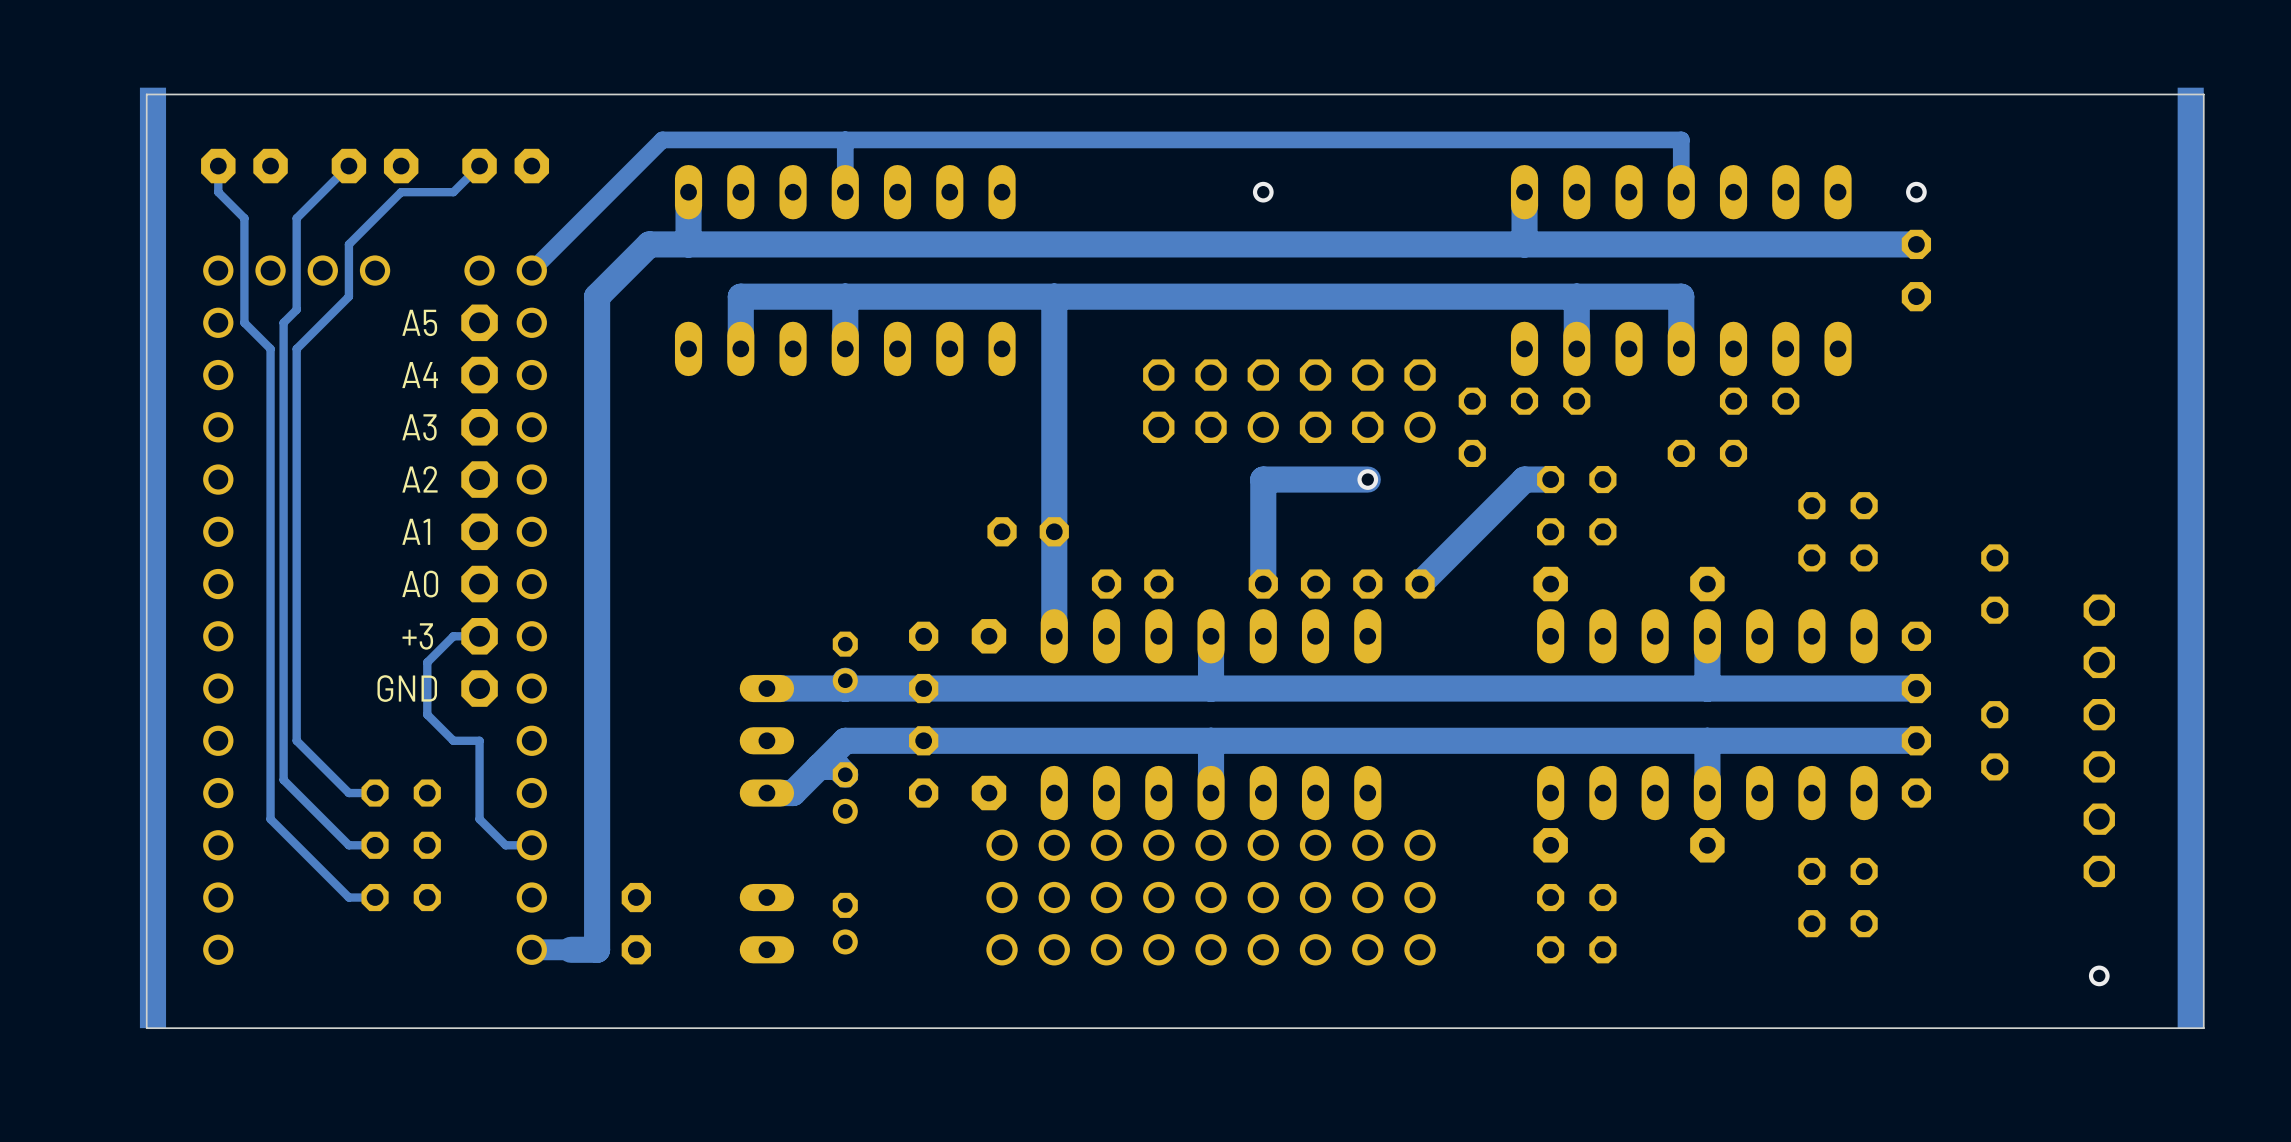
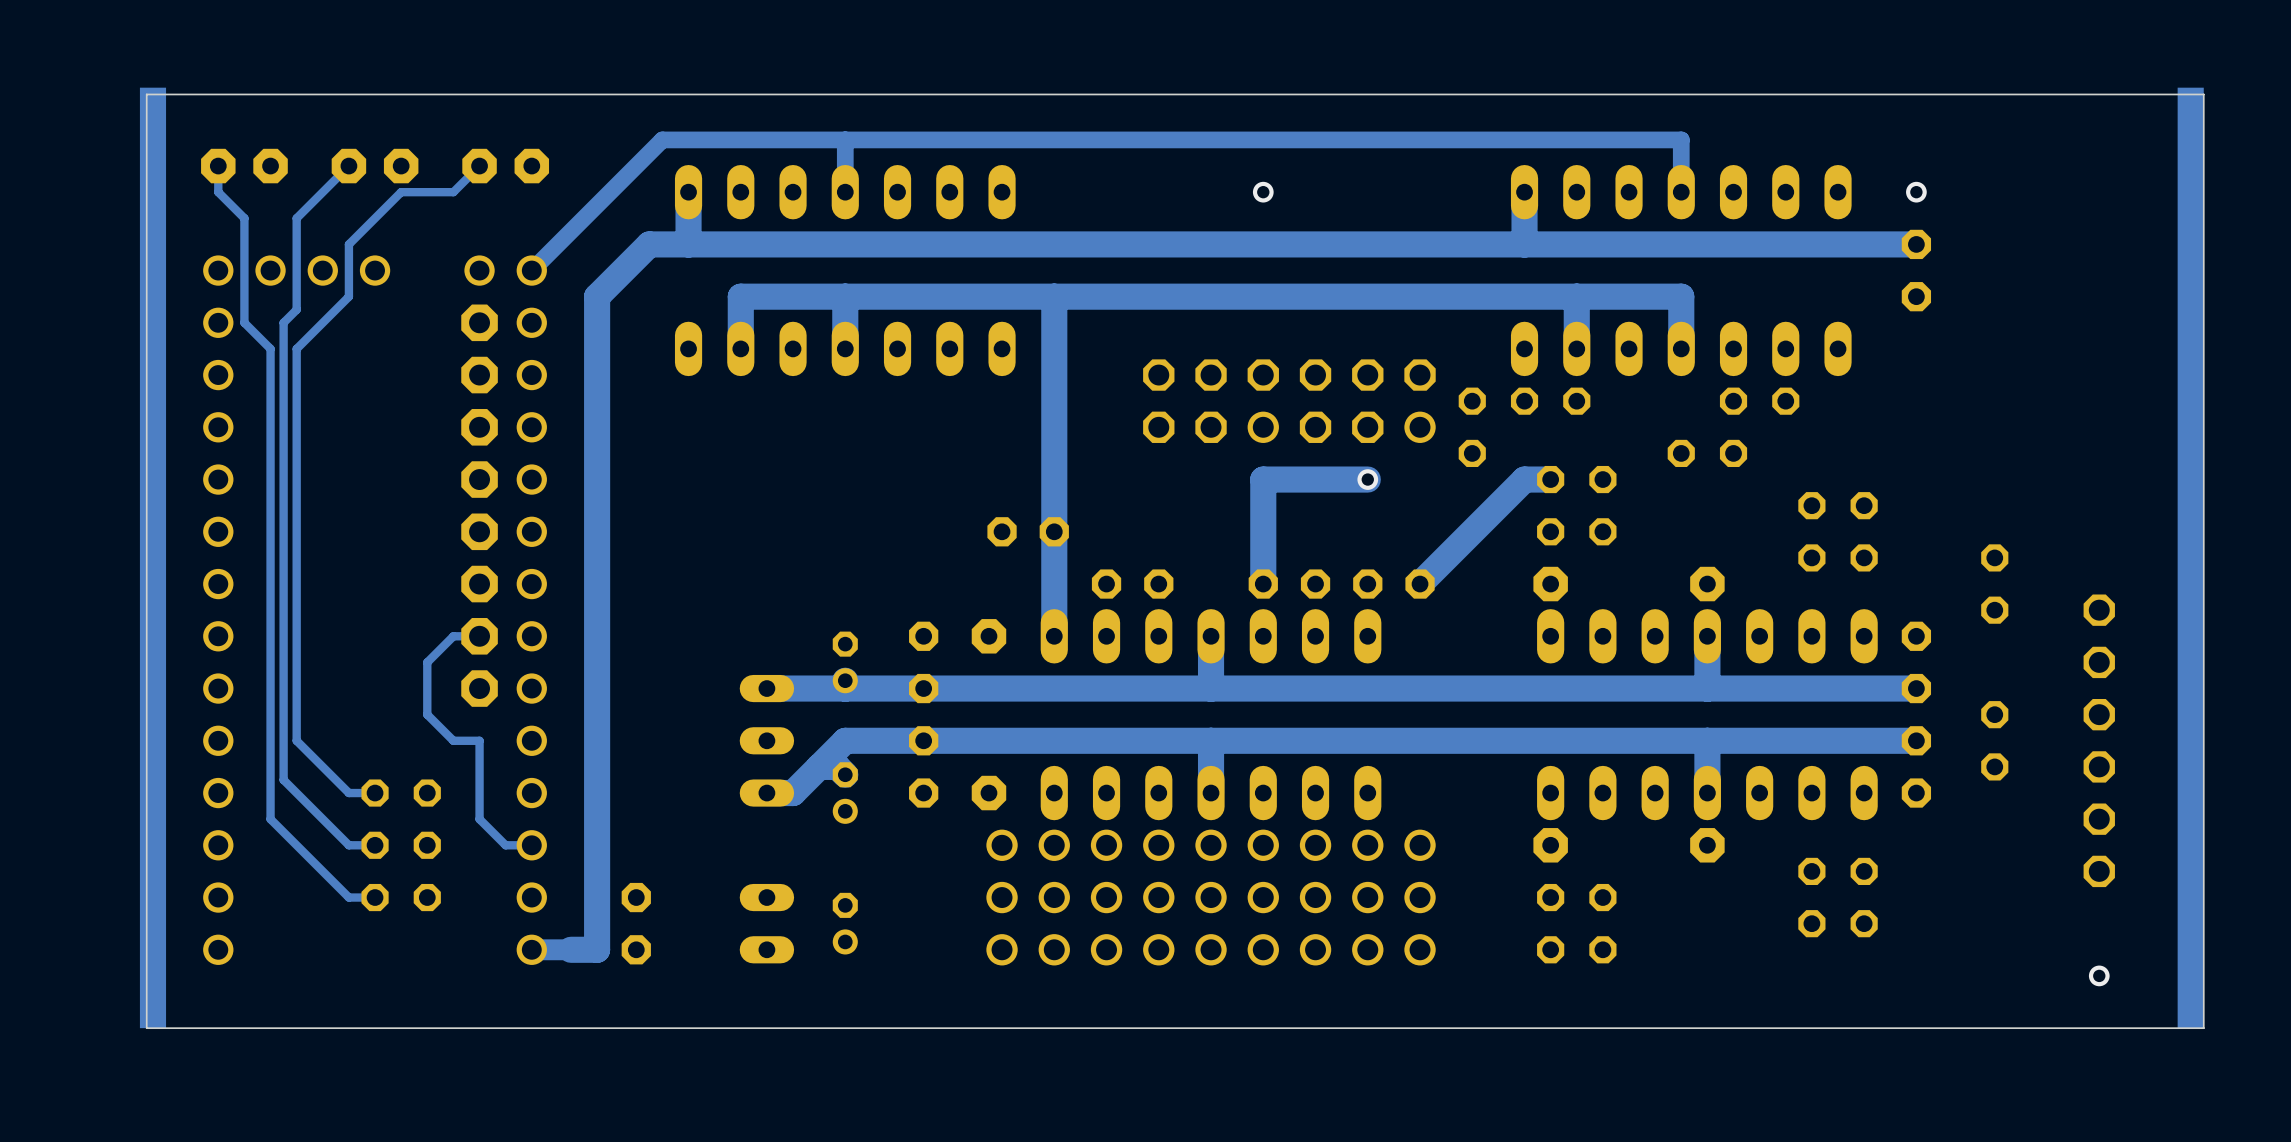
text: A5 (419, 322) -> none
text: A4 (420, 375) -> none
text: A3 (419, 427) -> none
text: A2 (419, 479) -> none
text: A1 (416, 531) -> none
text: A0 (420, 584) -> none
text: +3 (417, 636) -> none
text: GND (407, 688) -> none

